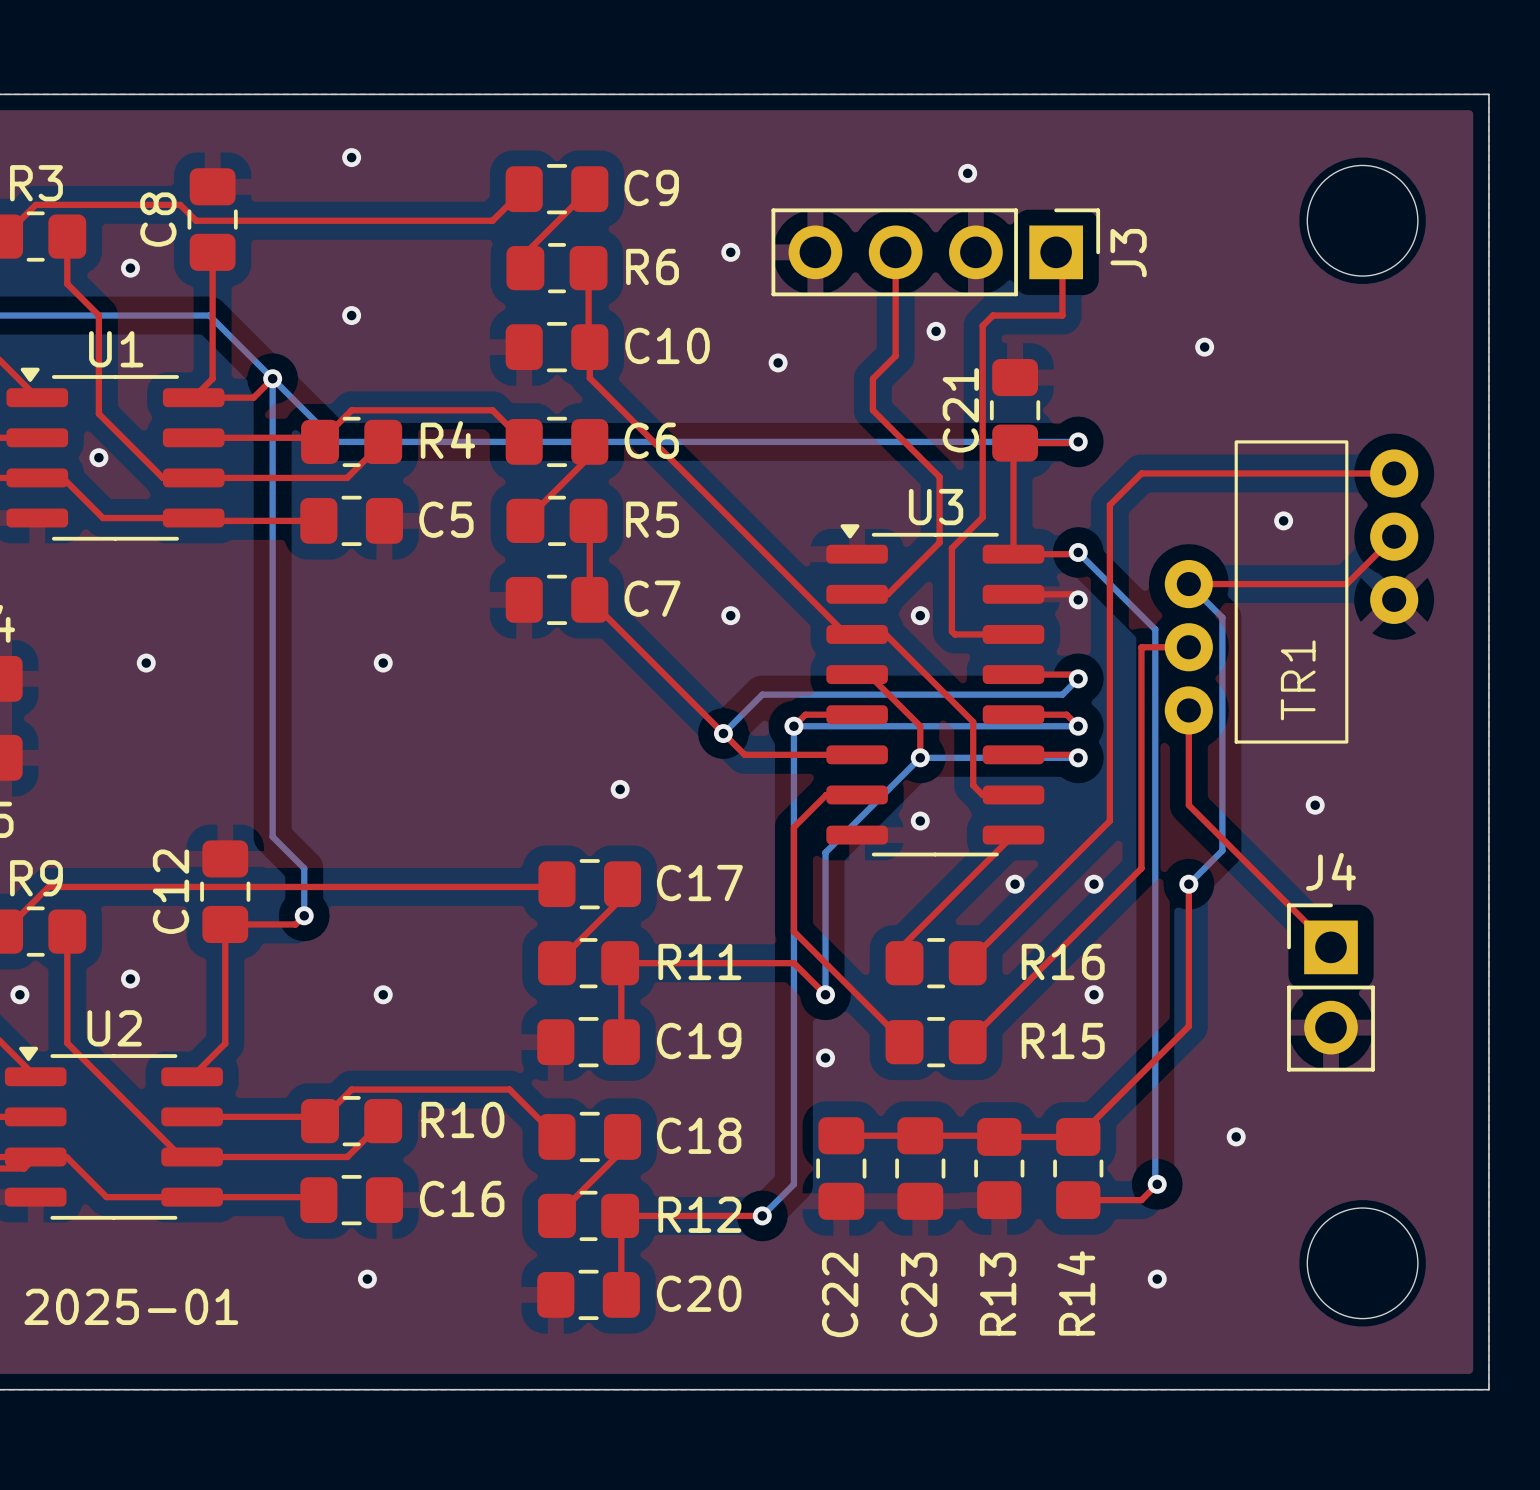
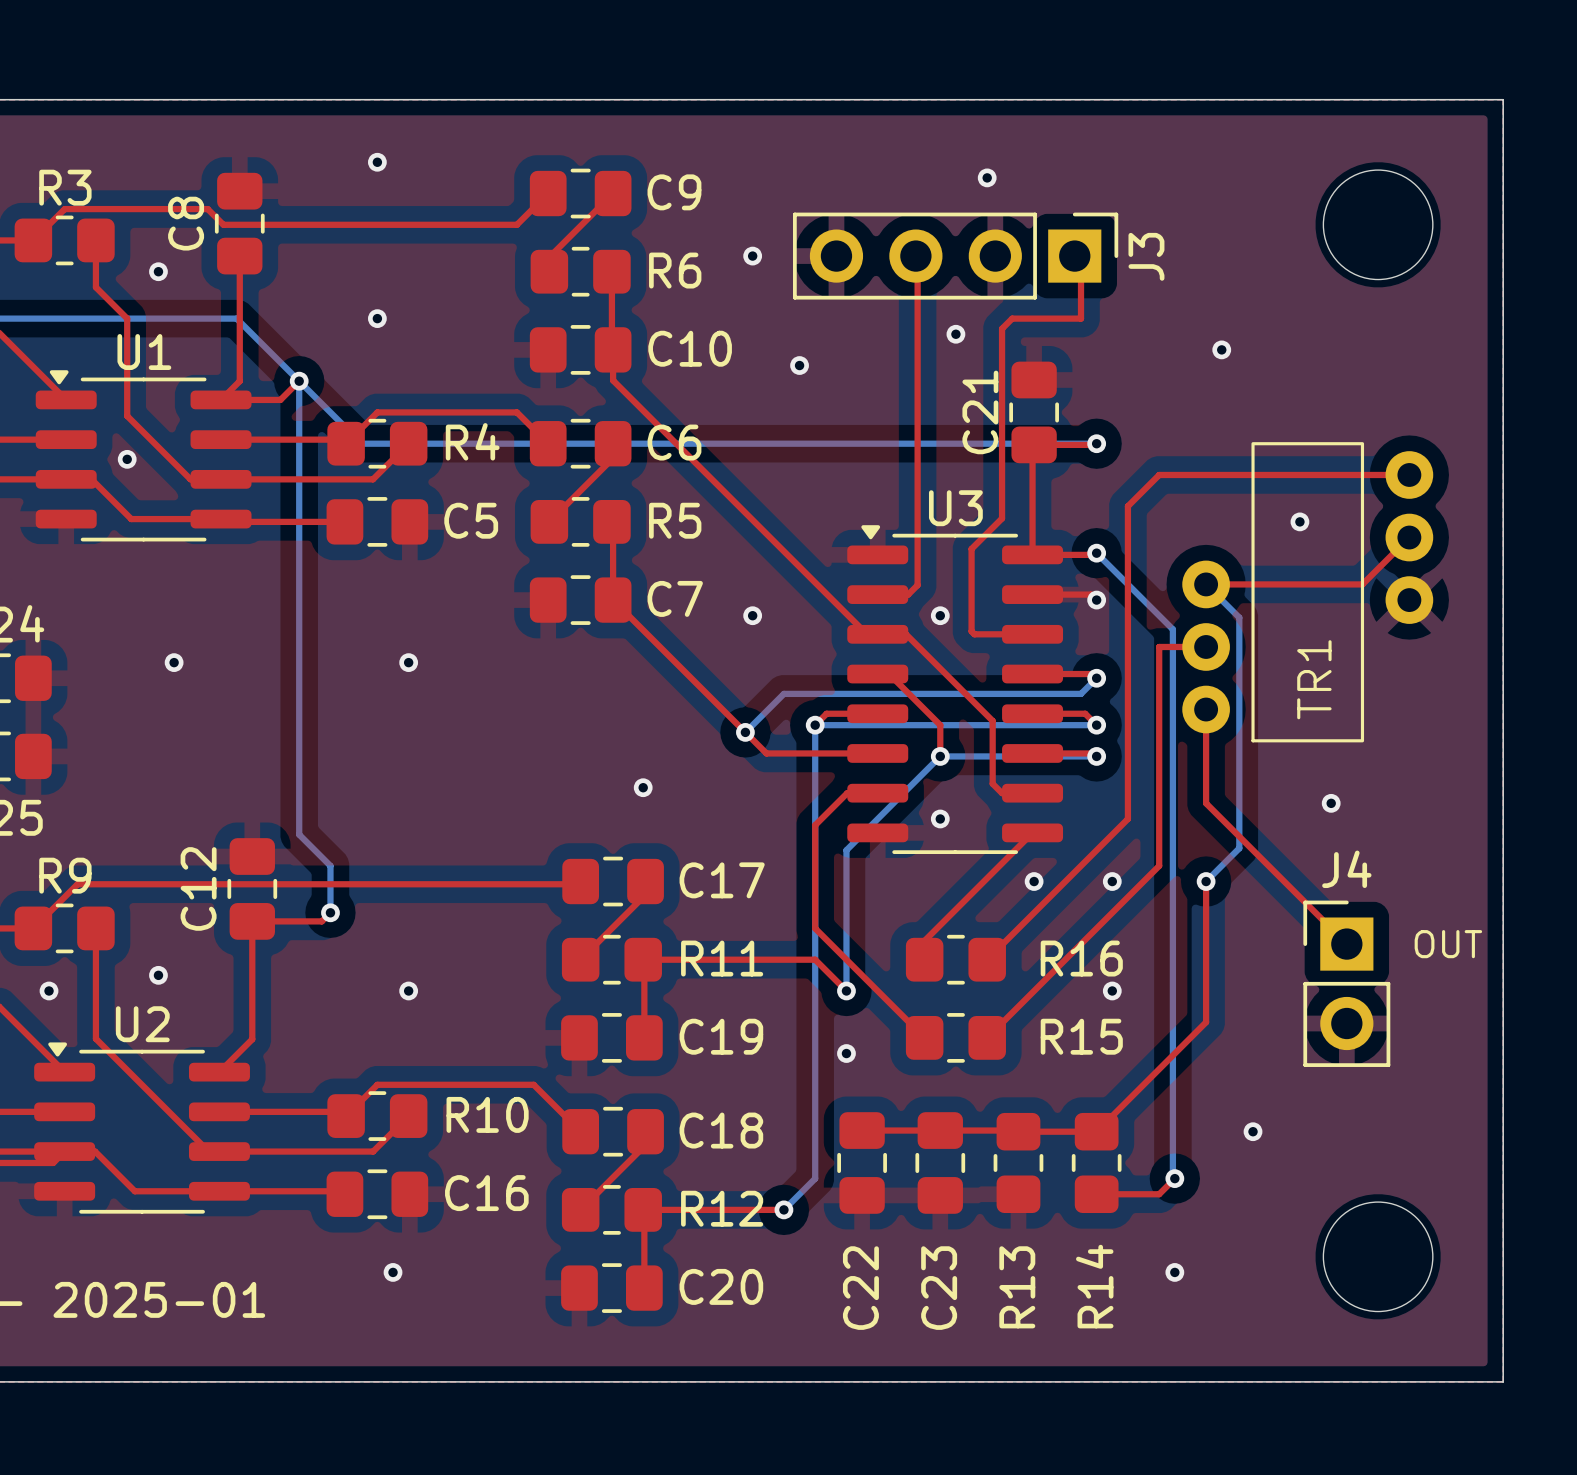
top track: (895, 252) (895, 355) (872, 378) (872, 410) (939, 476) (939, 542) (897, 584) -> (915, 256) (917, 257) (917, 585)
text: none -> OUT (1448, 944)

